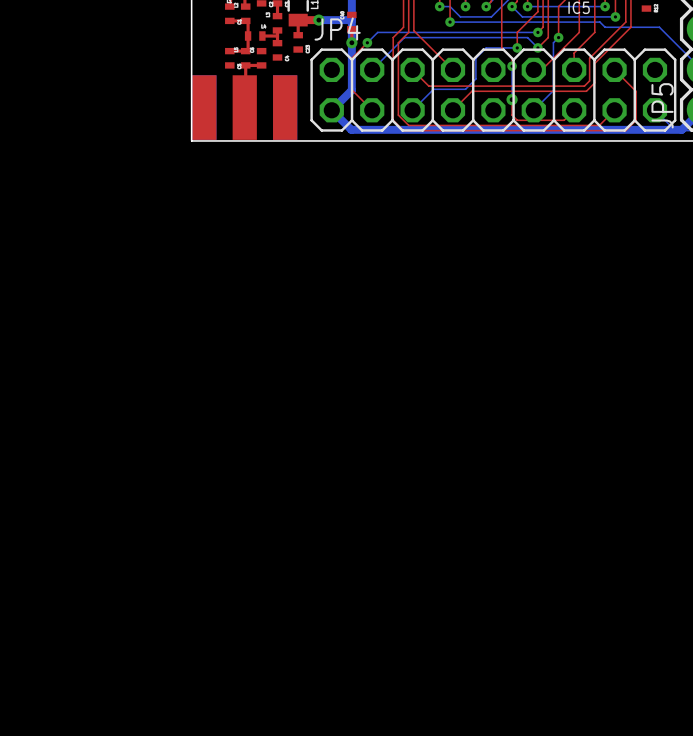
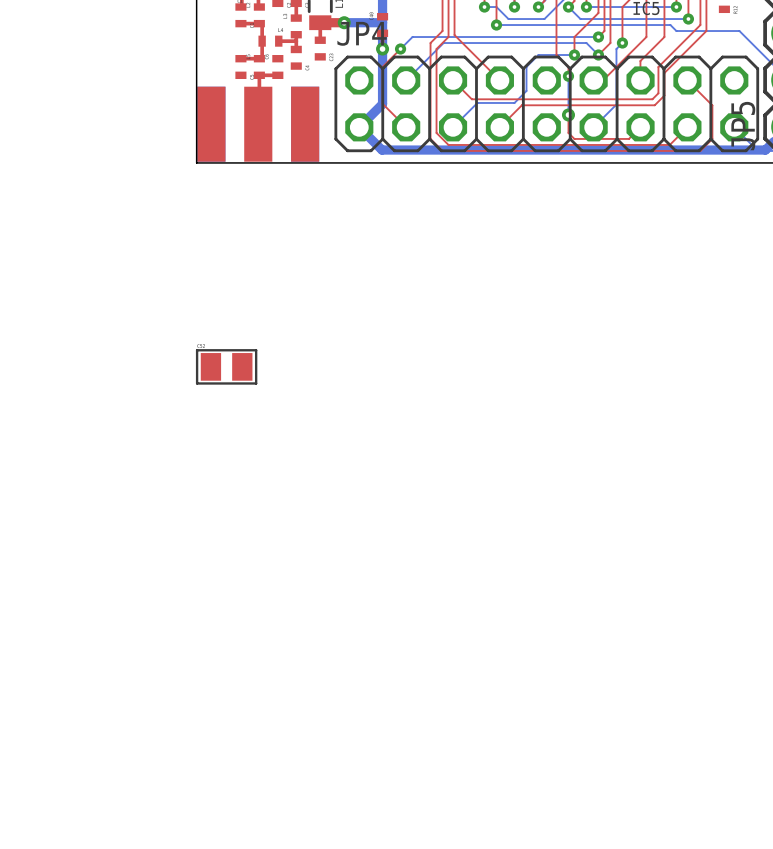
part: none -> (226, 366)

